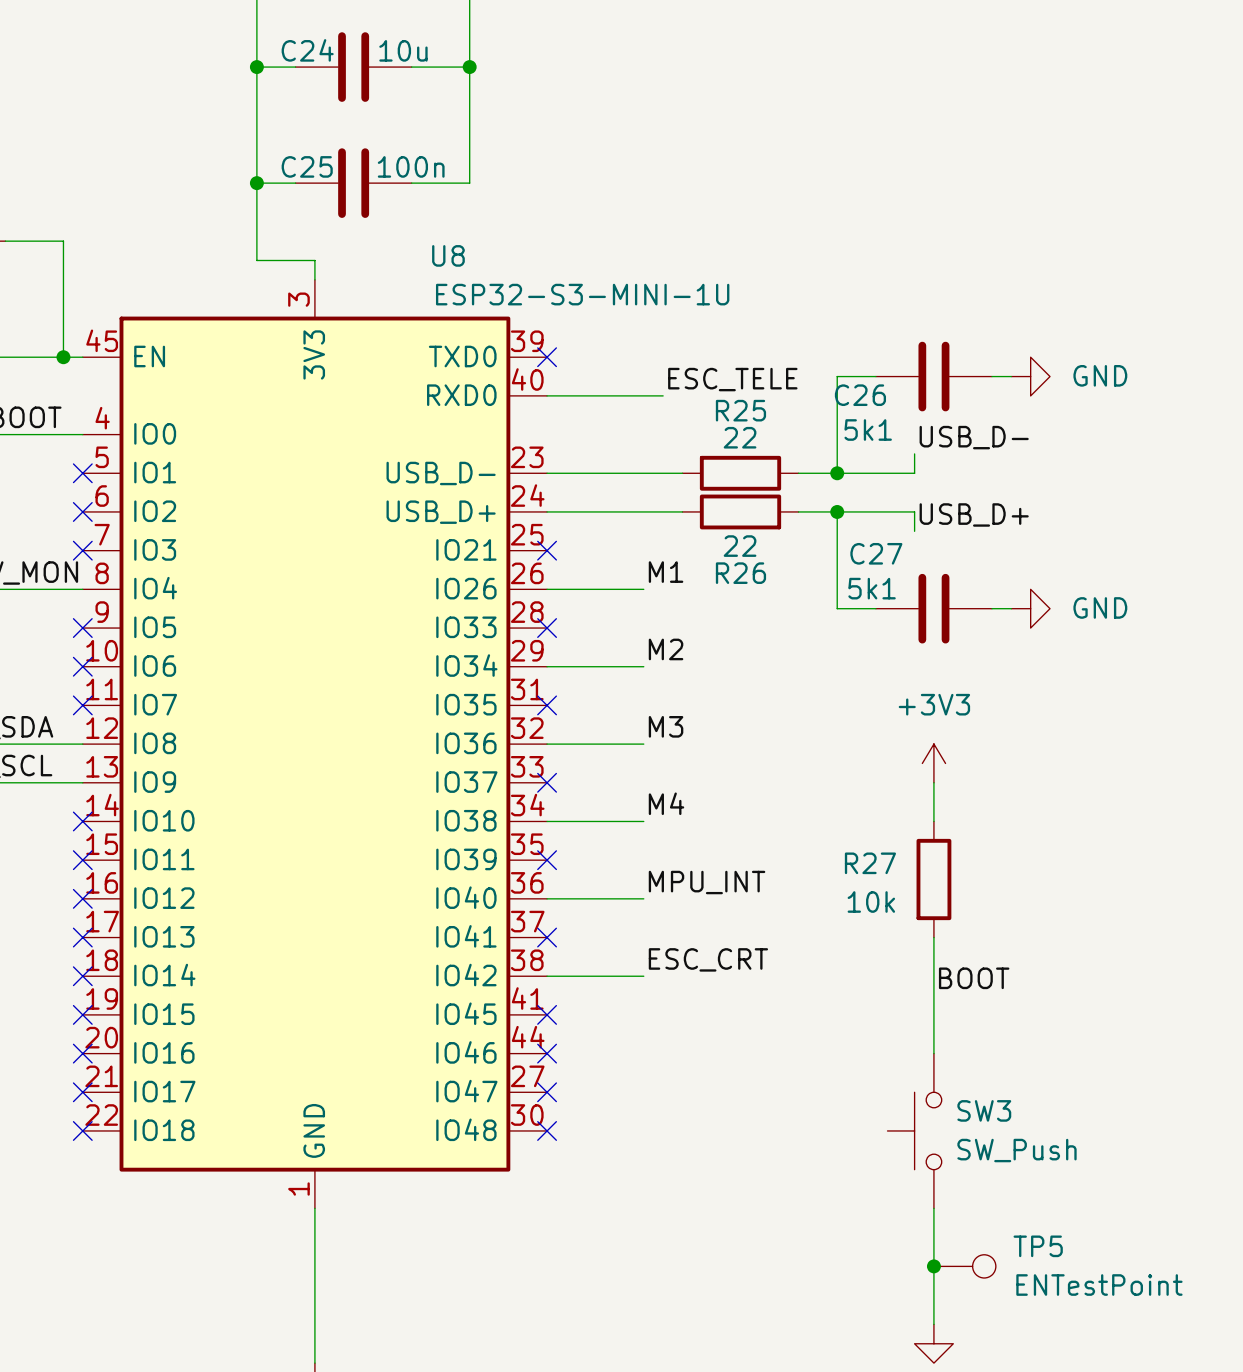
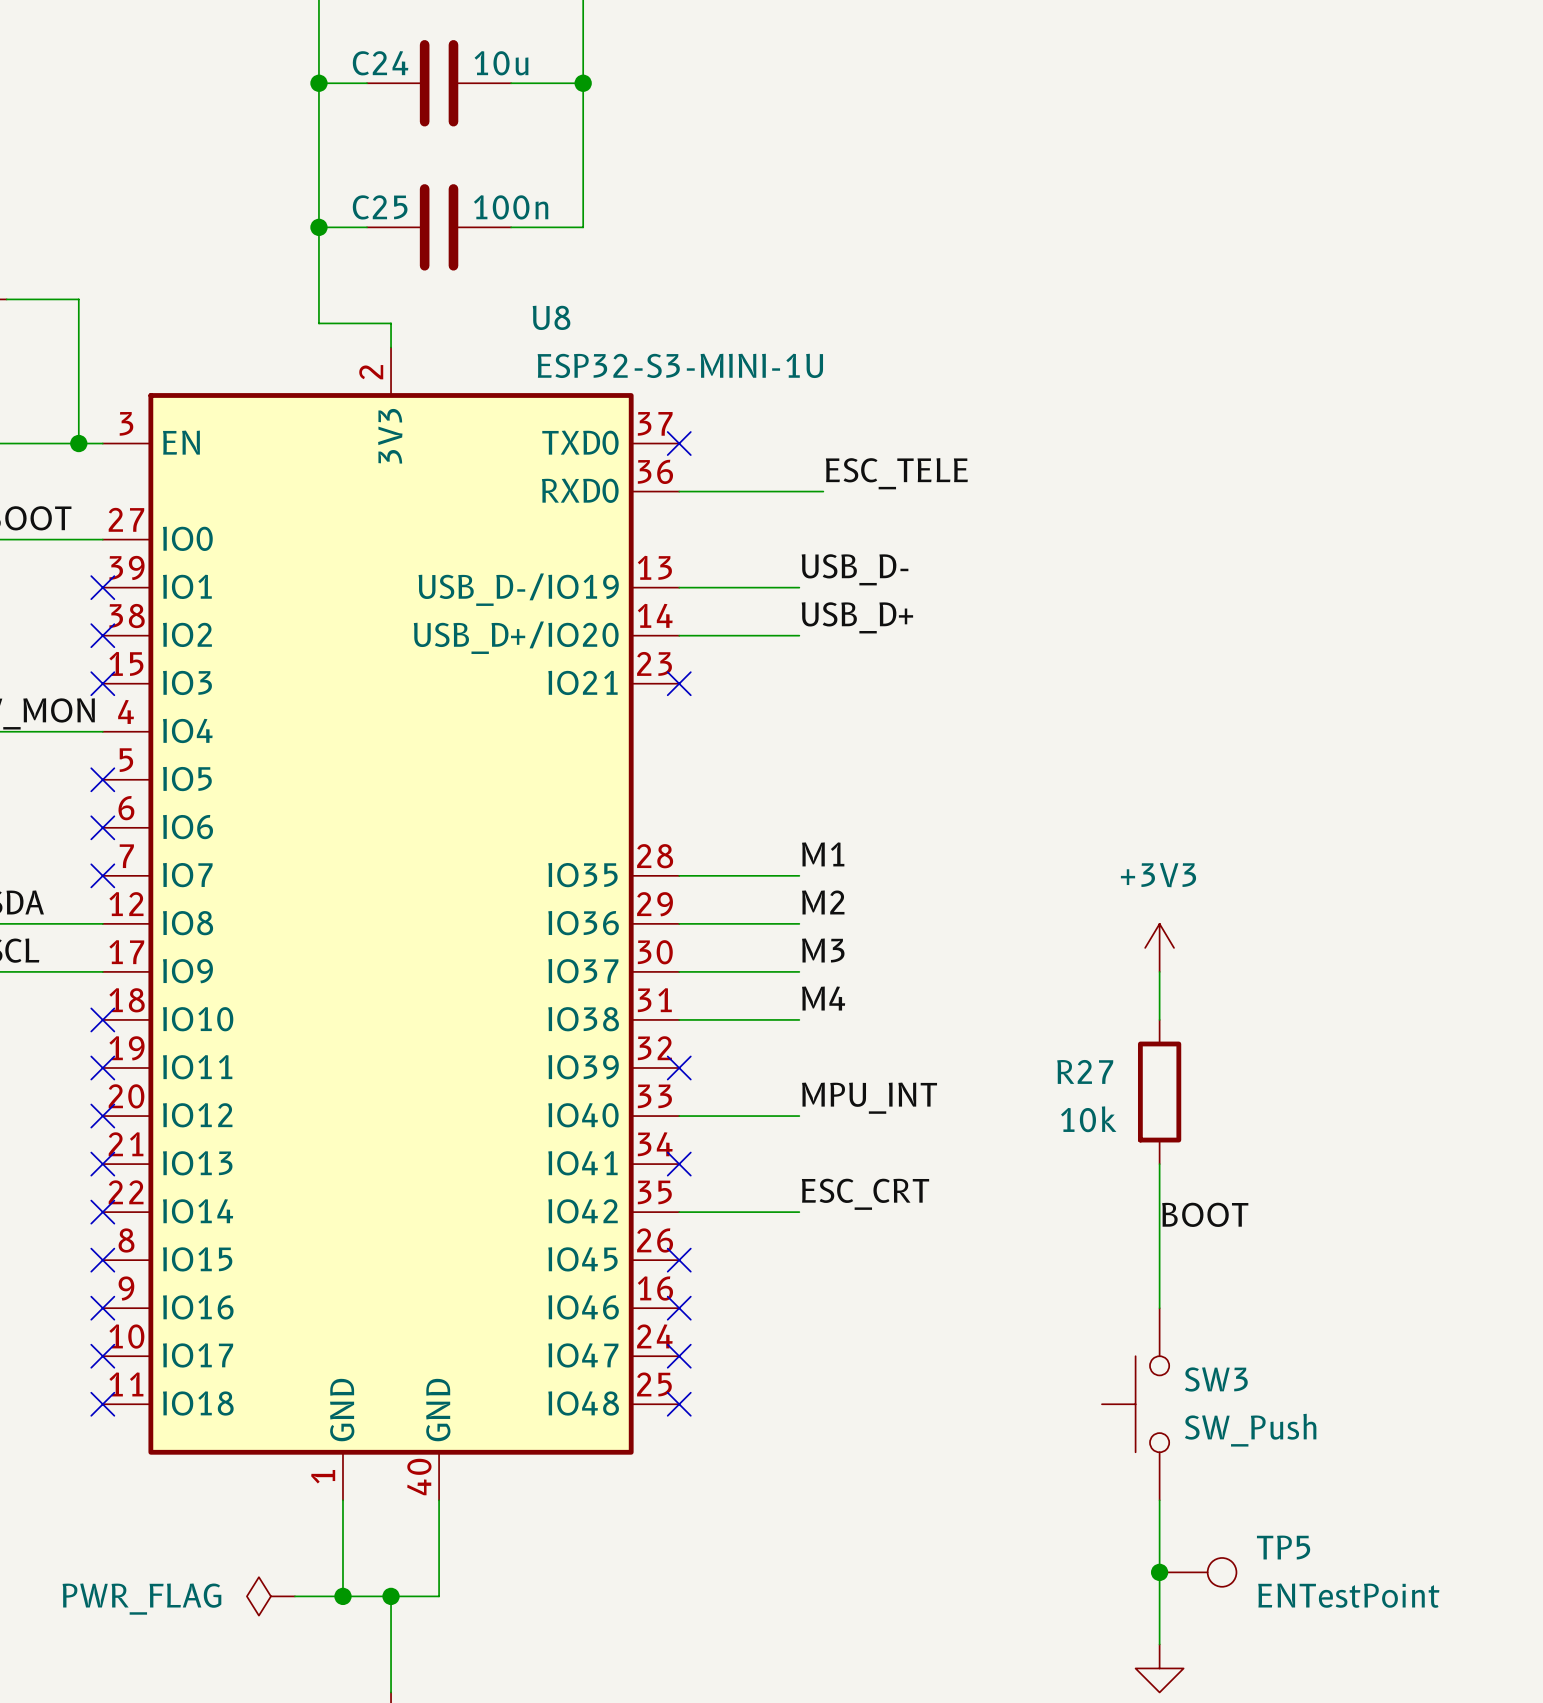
U8 symbol: [82, 279, 548, 1209] -> [102, 347, 680, 1501]
wire: (875, 376) (837, 376) (837, 473) -> none
C26: 5k1 (933, 376) -> none
wire: (991, 376) (1011, 376) -> none
power symbol: GND (1030, 376) -> none
label position: USB_D- (974, 437) -> USB_D- (855, 569)
wire: (914, 453) (914, 473) (798, 473) -> none
wire: (643, 473) (682, 473) -> none
R25: 22 (740, 473) -> none
junction: (837, 473) -> none
wire: (643, 511) (682, 511) -> none
R26: 22 (740, 511) -> none
wire: (798, 511) (914, 511) (914, 531) -> none
wire: (837, 511) (837, 608) (875, 608) -> none
junction: (837, 511) -> none
label position: USB_D+ (974, 514) -> USB_D+ (857, 617)
label position: M1 (666, 572) -> M1 (823, 854)
wire: (547, 589) (643, 589) -> (679, 875) (799, 875)
C27: 5k1 (933, 608) -> none
wire: (991, 608) (1011, 608) -> none
power symbol: GND (1030, 608) -> none
no-connect mark: (547, 628) -> none
label: M2 (666, 649) -> none
wire: (547, 666) (643, 666) -> (679, 971) (799, 971)
no-connect mark: (547, 705) -> none
label: M3 (666, 726) -> M2 (823, 902)
label: none -> M3 (823, 950)
no-connect mark: (547, 782) -> none
wire: (314, 1208) (314, 1285) -> (342, 1500) (342, 1596)
wire: none -> (439, 1500) (439, 1596) (294, 1596)
power symbol: none -> PWR_FLAG (270, 1596)
junction: none -> (342, 1596)
junction: none -> (391, 1596)

